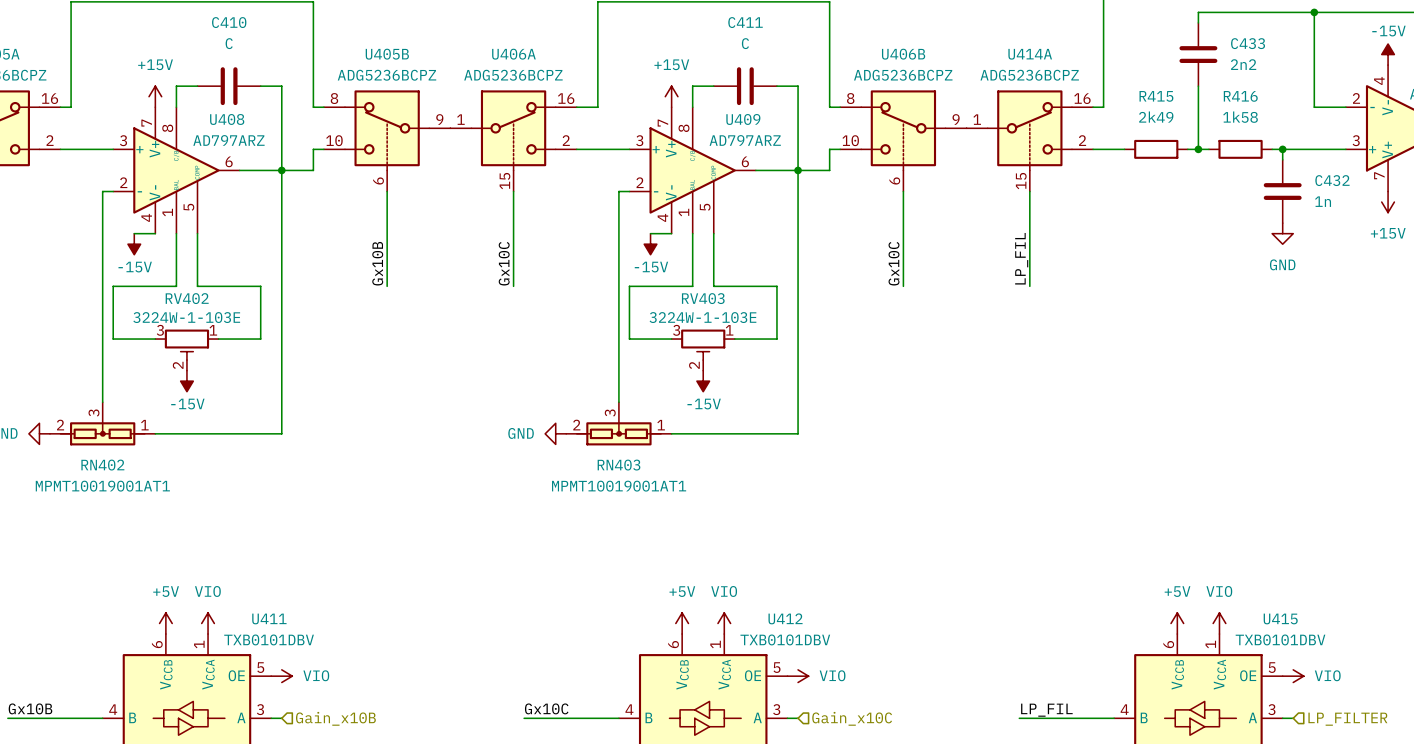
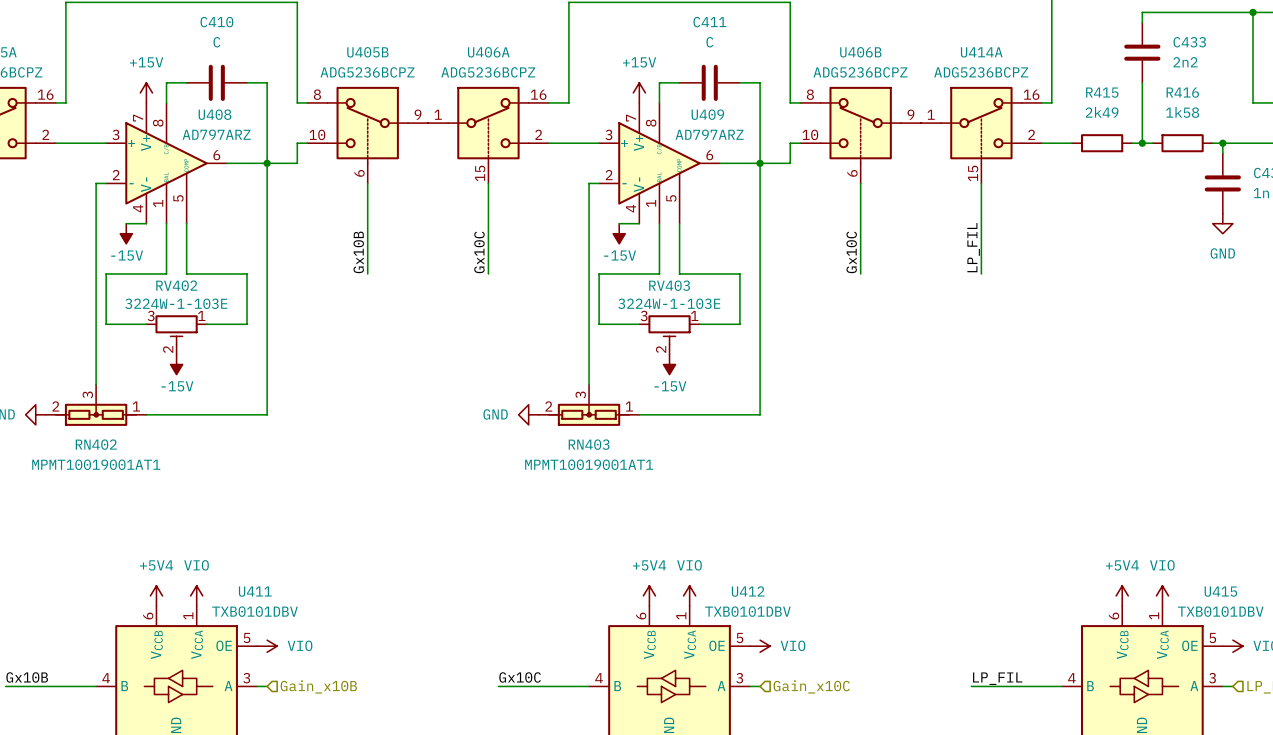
power symbol: +5V (165, 623) -> +5V4 (156, 595)
power symbol: +5V (682, 623) -> +5V4 (649, 595)
power symbol: +5V (1177, 623) -> +5V4 (1122, 595)

